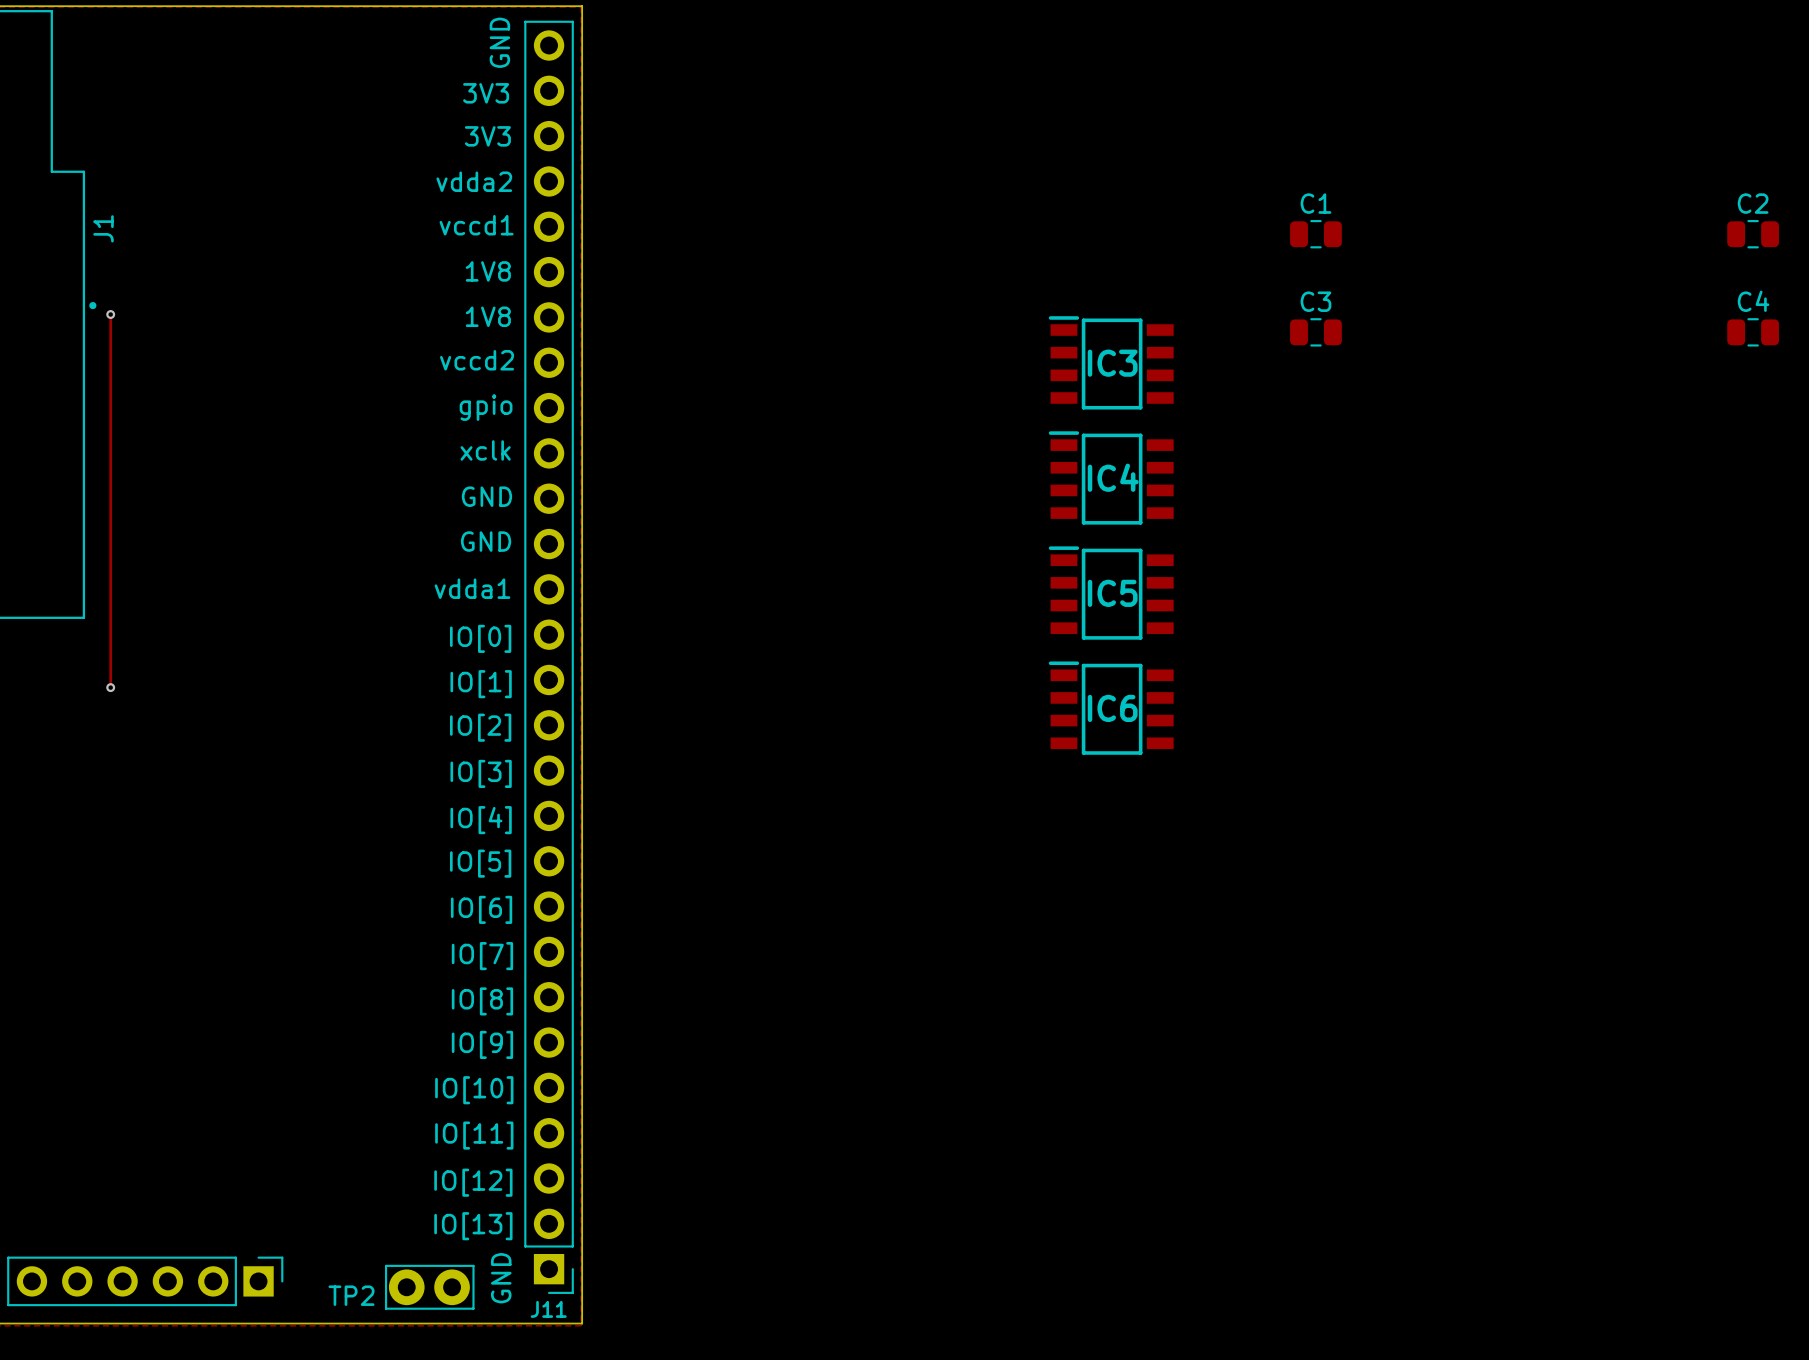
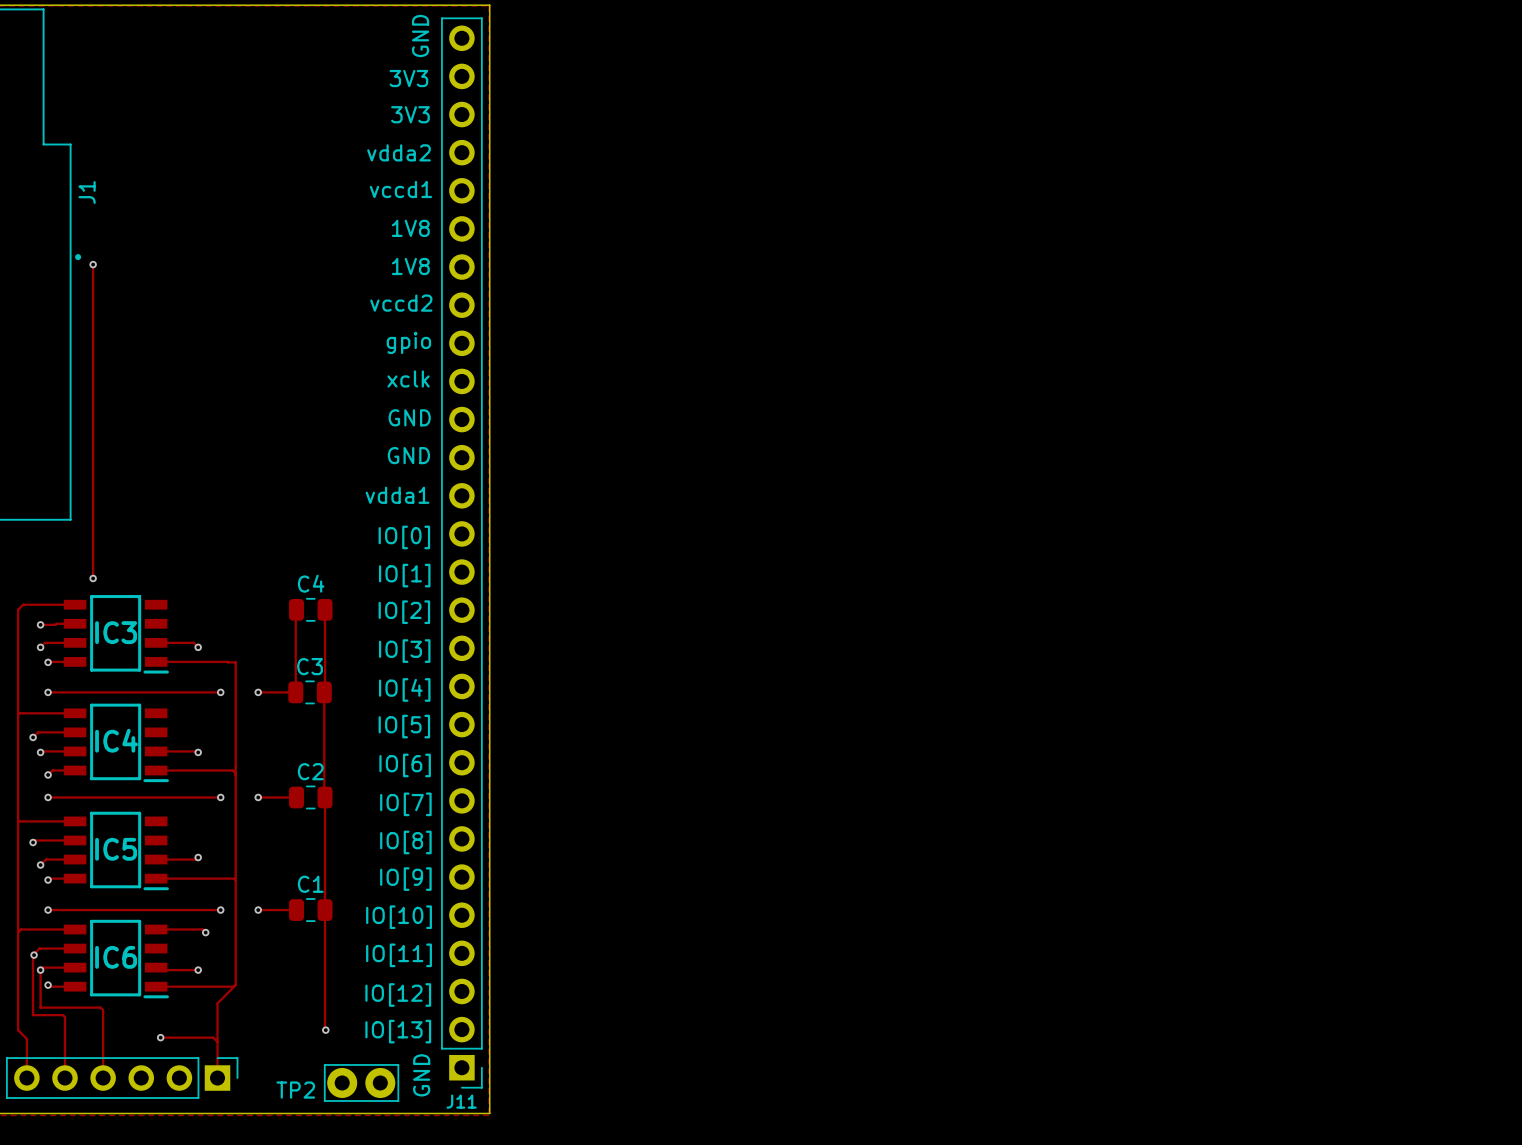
C1 position: (1315, 234) -> (310, 910)
C2 position: (1753, 234) -> (310, 797)
C3 position: (1315, 332) -> (310, 692)
C4 position: (1753, 332) -> (310, 609)
IC3 rotation: 0° (1111, 362) -> 180° (116, 634)
IC3 position: (1111, 362) -> (116, 634)
IC4 rotation: 0° (1111, 477) -> 180° (116, 742)
IC4 position: (1111, 477) -> (116, 742)
IC5 rotation: 0° (1111, 593) -> 180° (116, 850)
IC5 position: (1111, 593) -> (116, 850)
IC6 rotation: 0° (1111, 708) -> 180° (116, 959)
IC6 position: (1111, 708) -> (116, 959)
track: none -> (75, 604) (23, 604) (18, 609) (18, 1030) (26, 1038) (26, 1078)
track: none -> (296, 609) (295, 692) (258, 692)
track: none -> (325, 609) (325, 1030)
track: none -> (75, 623) (40, 624)
via: none -> (40, 624)
track: none -> (75, 642) (45, 642) (40, 647)
track: none -> (156, 642) (193, 642) (198, 647)
via: none -> (40, 647)
via: none -> (198, 647)
track: none -> (75, 661) (48, 662)
track: none -> (156, 661) (235, 662) (235, 985) (217, 1003) (217, 1078)
via: none -> (48, 662)
track: none -> (48, 692) (220, 692)
via: none -> (48, 692)
via: none -> (220, 692)
via: none -> (258, 692)
track: none -> (75, 713) (19, 713) (18, 714)
track: none -> (75, 732) (38, 732) (33, 737)
via: none -> (33, 737)
track: none -> (75, 751) (40, 752)
track: none -> (156, 751) (198, 752)
via: none -> (40, 752)
via: none -> (198, 752)
track: none -> (75, 770) (52, 770) (48, 774)
track: none -> (156, 770) (232, 770) (235, 773)
via: none -> (48, 774)
track: none -> (48, 797) (220, 797)
via: none -> (48, 797)
via: none -> (220, 797)
track: none -> (258, 797) (296, 797)
via: none -> (258, 797)
track: none -> (18, 819) (75, 821)
track: none -> (75, 840) (35, 840) (33, 842)
via: none -> (33, 842)
track: none -> (198, 857) (196, 859) (156, 859)
via: none -> (198, 857)
track: none -> (75, 859) (46, 859) (40, 865)
via: none -> (40, 865)
track: none -> (75, 878) (48, 880)
track: none -> (156, 878) (235, 880)
via: none -> (48, 880)
track: none -> (48, 910) (220, 910)
via: none -> (48, 910)
via: none -> (220, 910)
track: none -> (258, 910) (296, 910)
via: none -> (258, 910)
track: none -> (75, 929) (21, 929) (18, 932)
track: none -> (156, 929) (202, 929) (205, 932)
via: none -> (205, 932)
track: none -> (75, 948) (39, 948) (33, 955) (33, 1015) (63, 1015) (65, 1017) (65, 1078)
via: none -> (34, 955)
track: none -> (75, 967) (43, 967) (40, 970) (40, 1007) (100, 1007) (103, 1010) (103, 1078)
track: none -> (156, 967) (158, 970) (198, 970)
via: none -> (40, 970)
via: none -> (198, 970)
track: none -> (48, 985) (75, 986)
via: none -> (48, 985)
track: none -> (156, 986) (234, 986)
via: none -> (325, 1030)
track: none -> (160, 1037) (213, 1037) (217, 1041)
via: none -> (160, 1037)

